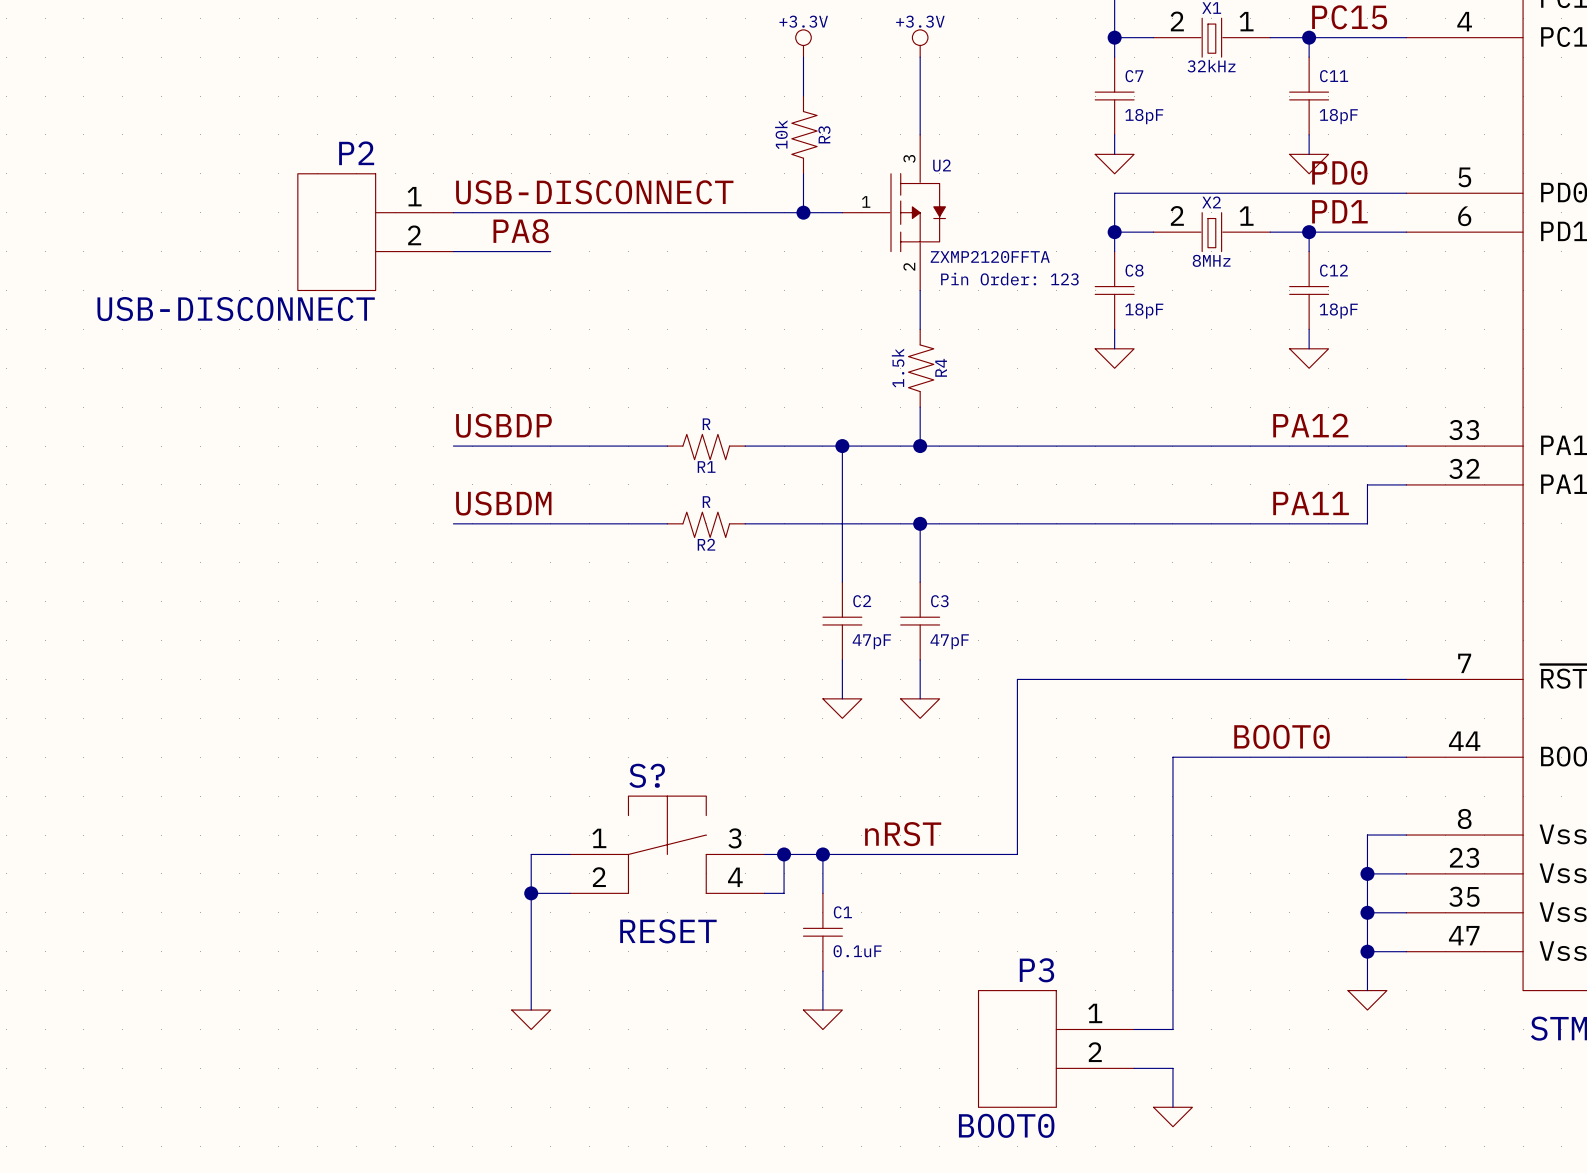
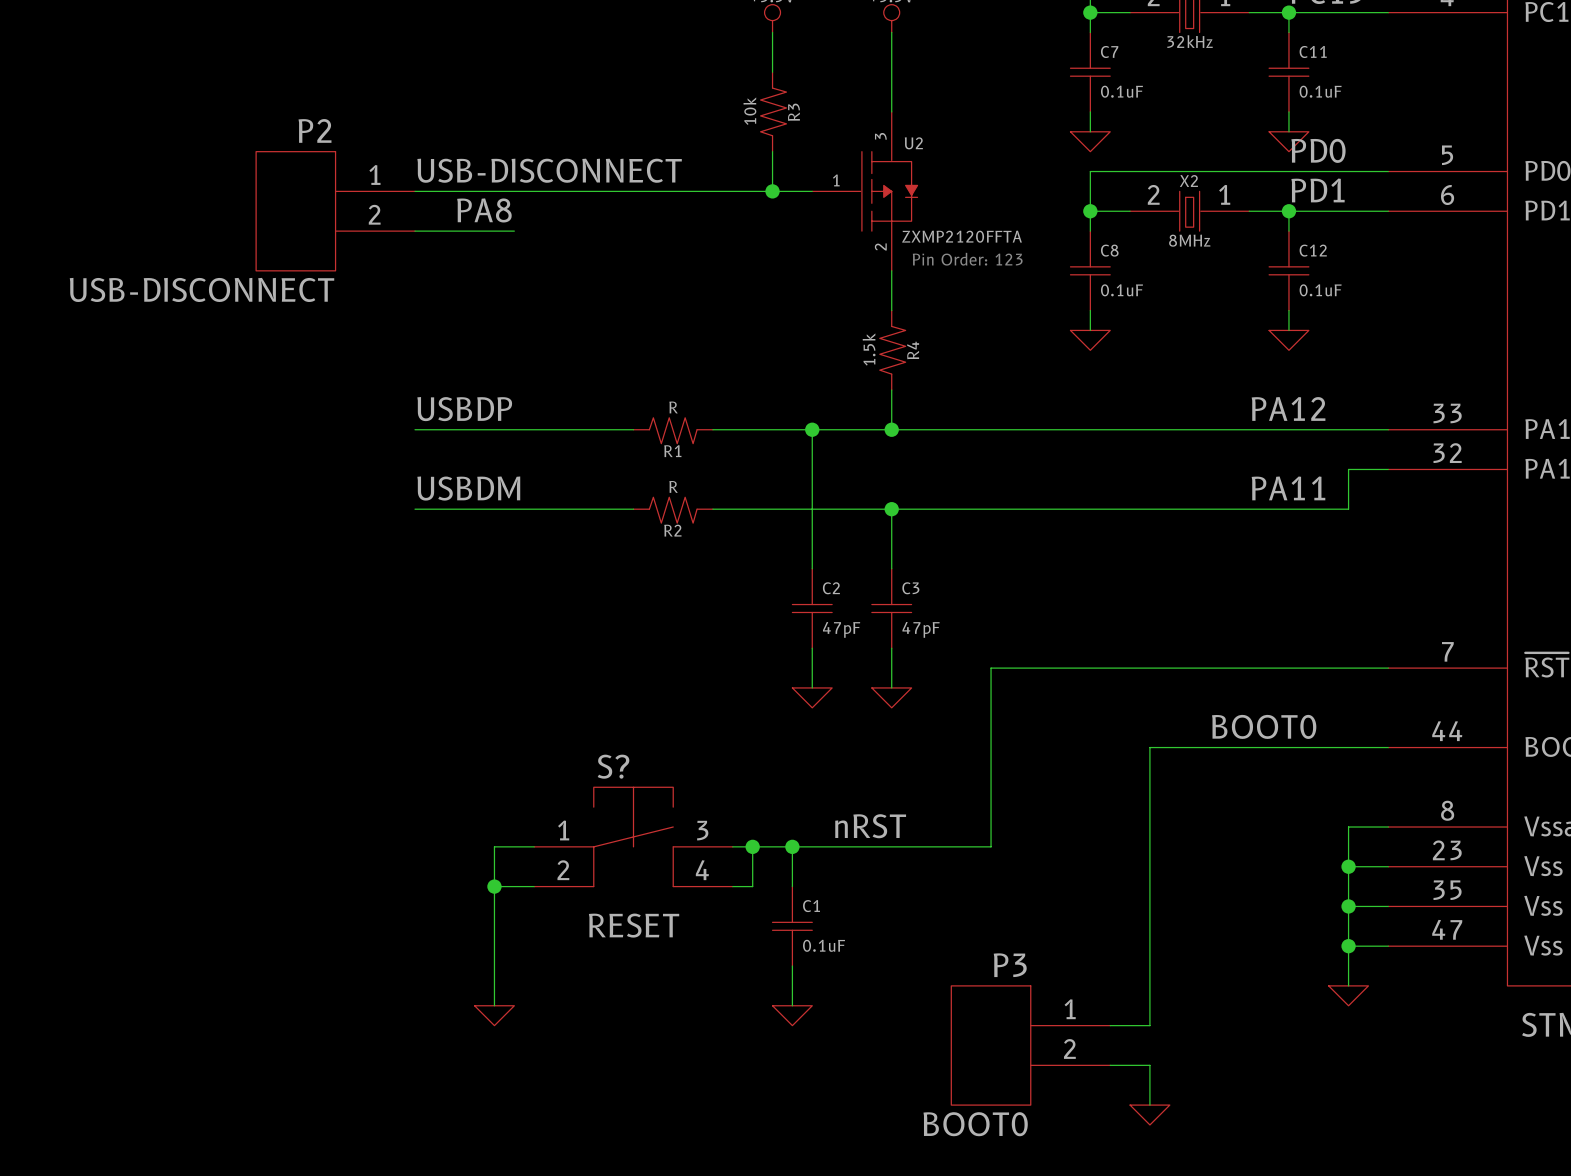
C7 value: 18pF (1144, 116) -> 0.1uF (1121, 91)
C11 value: 18pF (1338, 116) -> 0.1uF (1320, 91)
C8 value: 18pF (1144, 311) -> 0.1uF (1121, 290)
C12 value: 18pF (1338, 311) -> 0.1uF (1320, 290)

